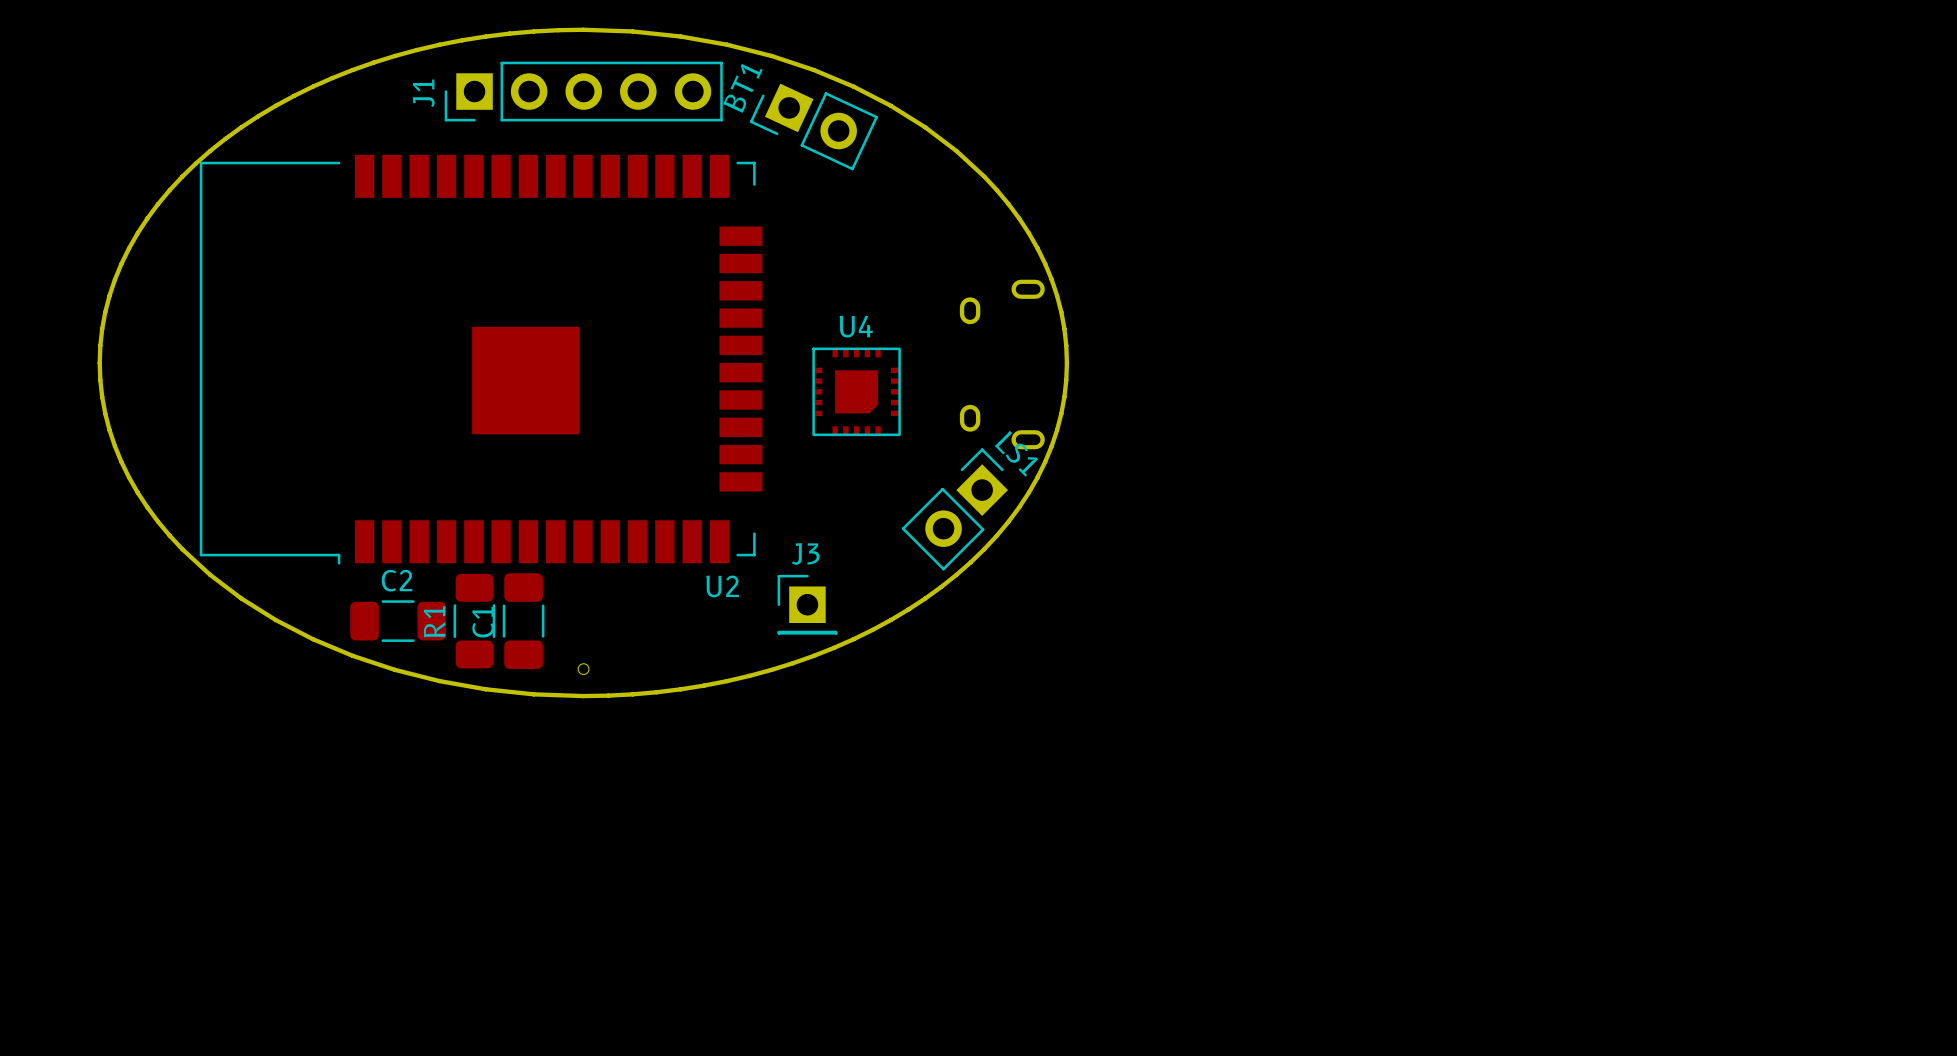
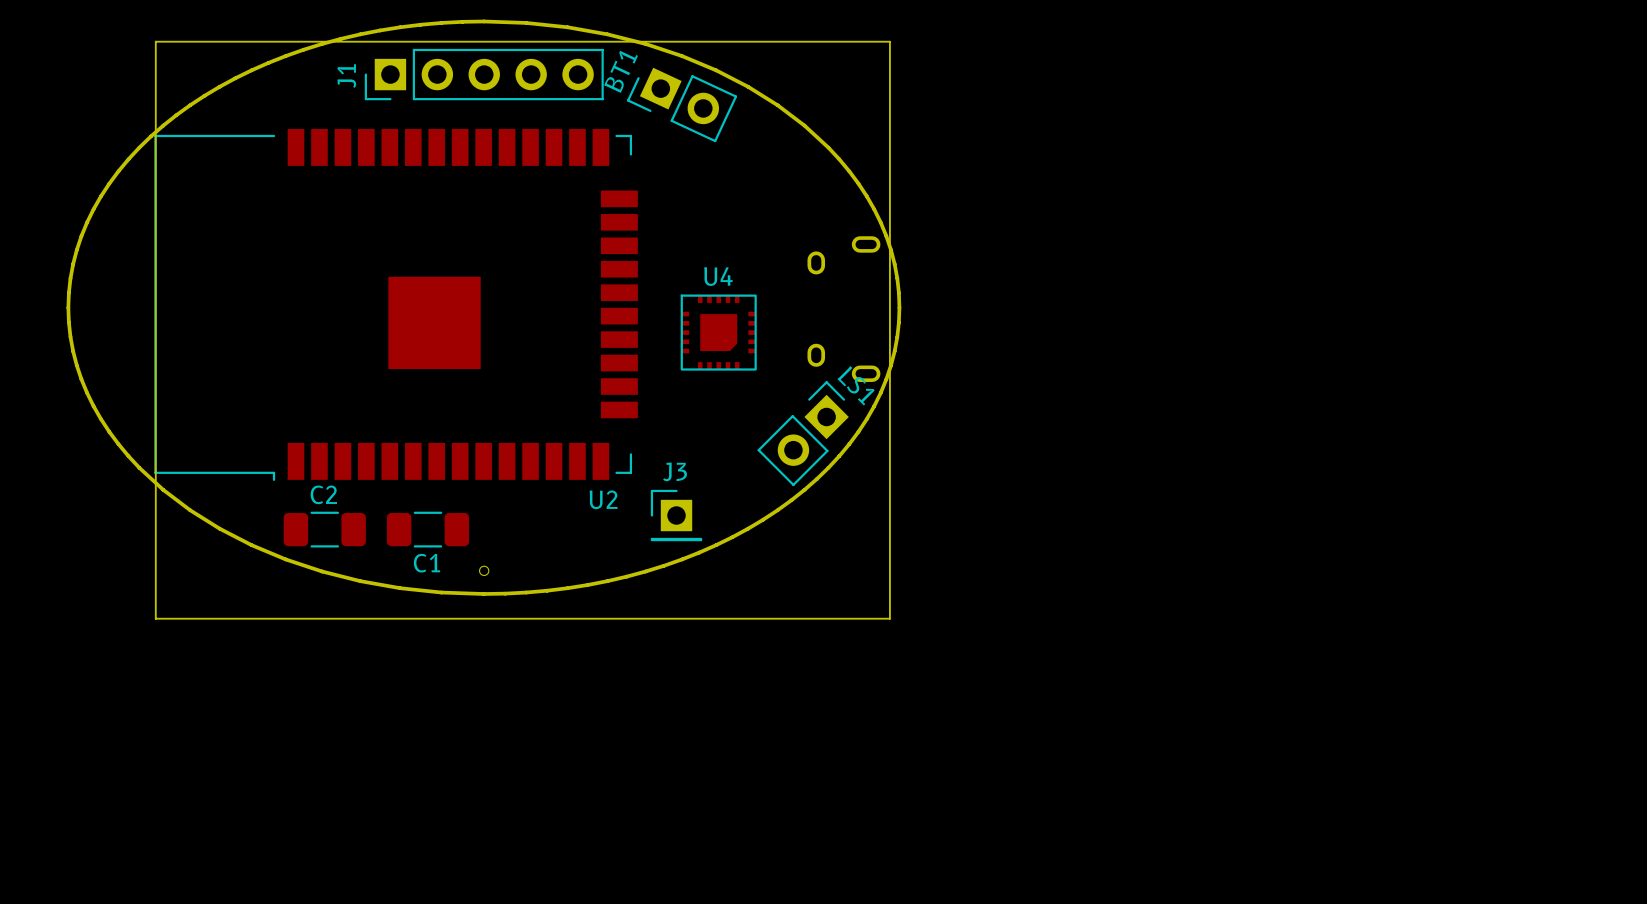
board edge: none -> (155, 41) (889, 41) (889, 618) (155, 618) (155, 41)
R1: (474, 621) -> none
C1 rotation: 0° (523, 621) -> 90° clockwise (427, 529)
C1 name position: C1 (483, 622) -> C1 (426, 563)

